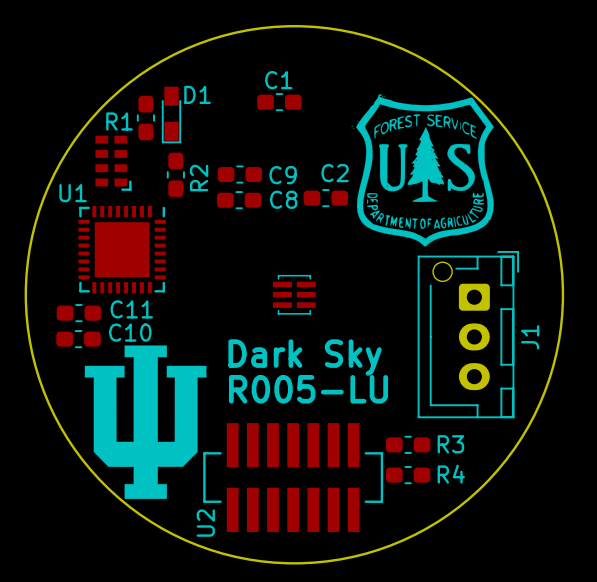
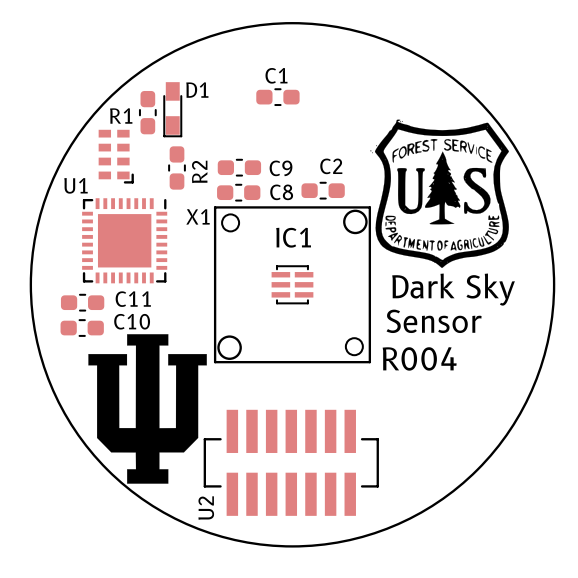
drawing position: (422, 170) -> (439, 193)
IC1 name: none -> IC1 (293, 237)
X1: none -> (292, 284)
text: none -> Sensor (434, 321)
J1: (468, 334) -> none
text position: Dark Sky (305, 357) -> Dark Sky (453, 289)
text: none -> R004 (419, 358)
text: R005-LU (308, 389) -> none
R3: (408, 444) -> none
R4: (408, 475) -> none

